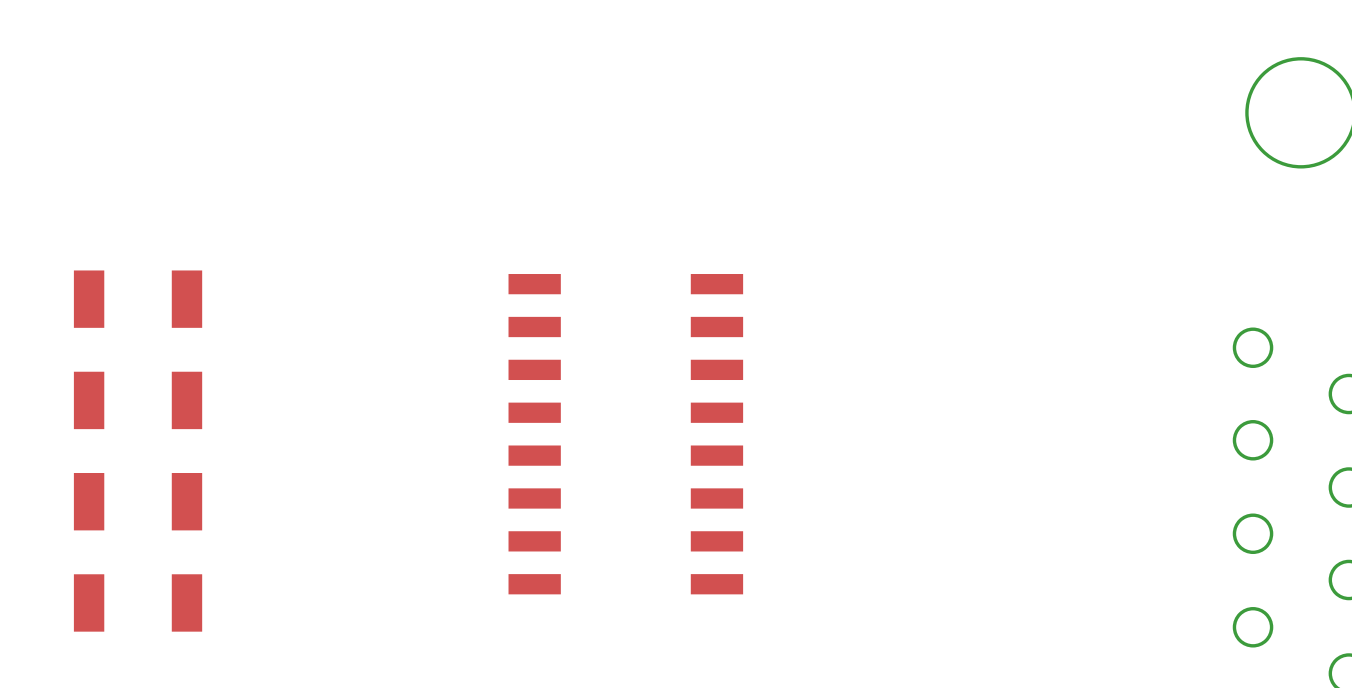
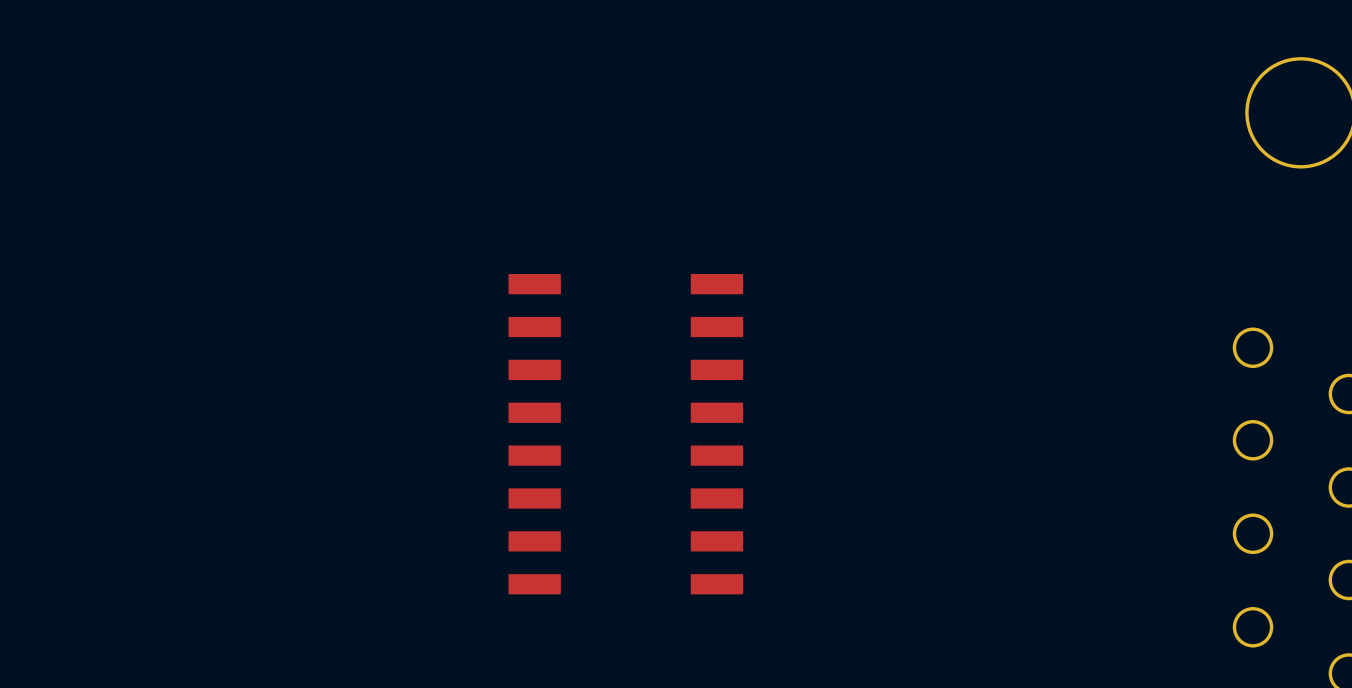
part: (138, 299) -> none
part: (138, 400) -> none
part: (138, 501) -> none
part: (138, 602) -> none

